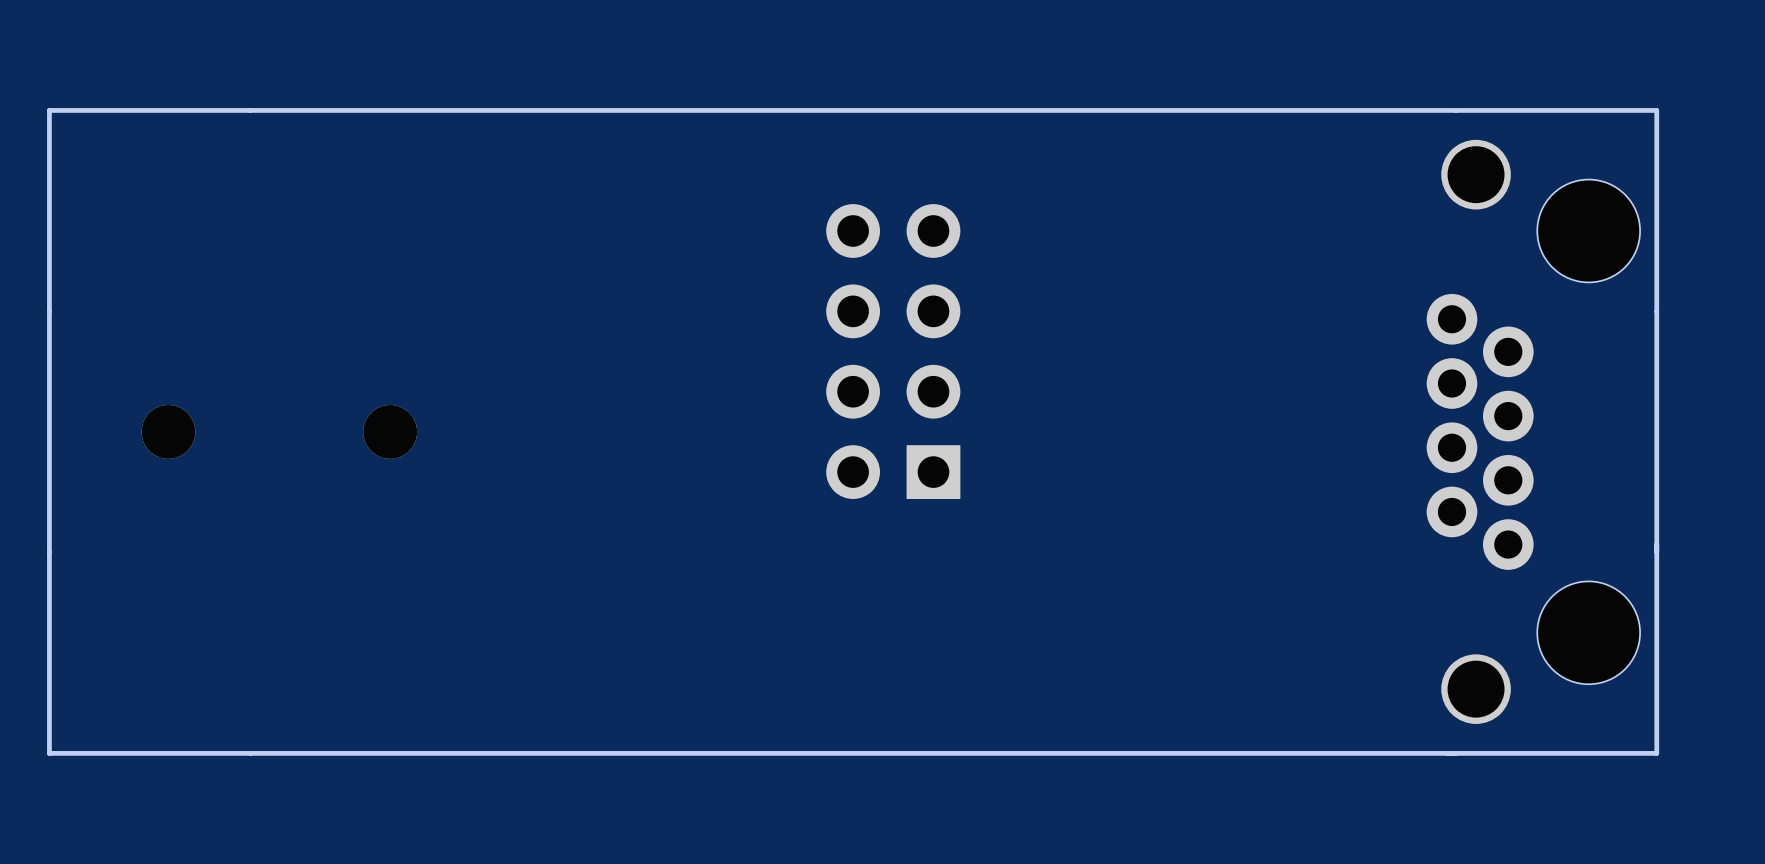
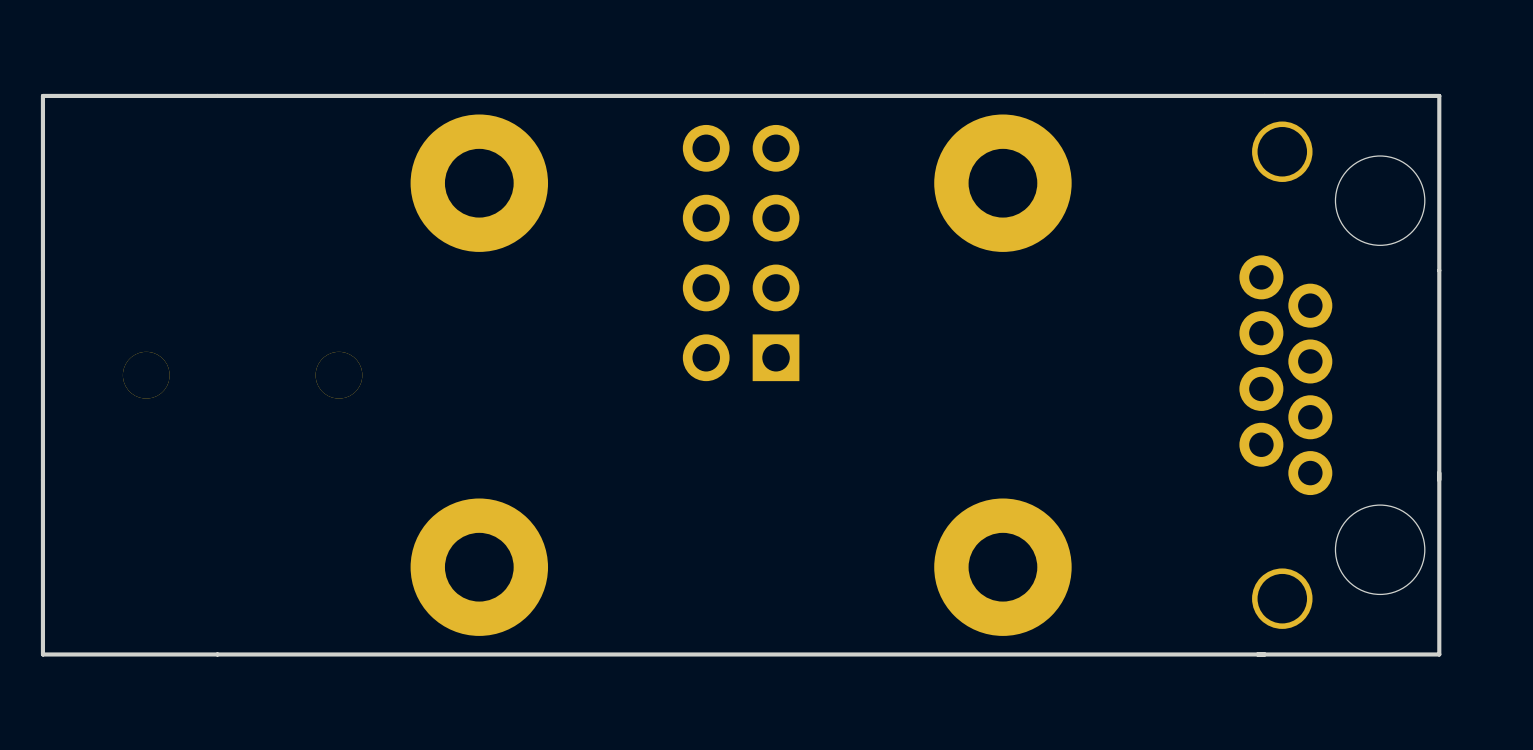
part: none -> (479, 183)
part: none -> (1002, 183)
part position: (893, 351) -> (741, 253)
part: none -> (479, 567)
part: none -> (1002, 567)

